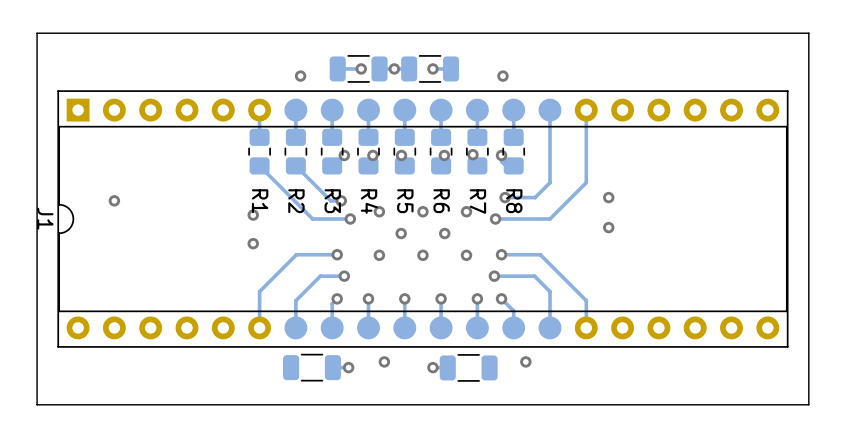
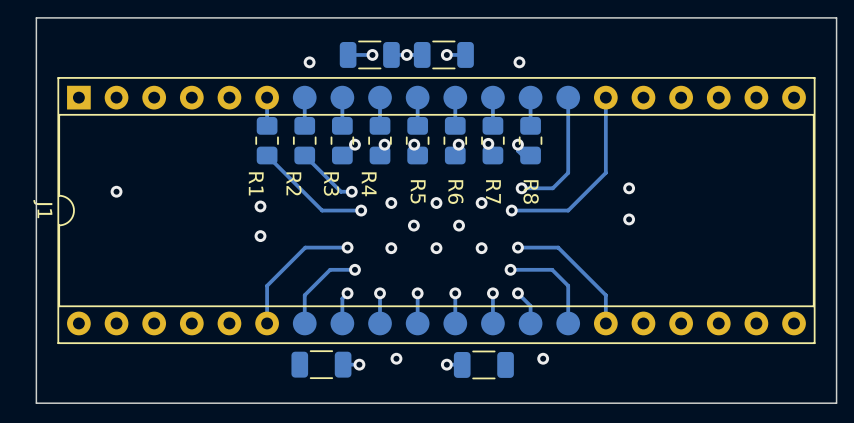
R1 name position: R1 (260, 201) -> R1 (256, 183)
R2 name position: R2 (296, 201) -> R2 (294, 183)
R3 name position: R3 (332, 201) -> R3 (331, 184)
R4 name position: R4 (369, 201) -> R4 (369, 184)

